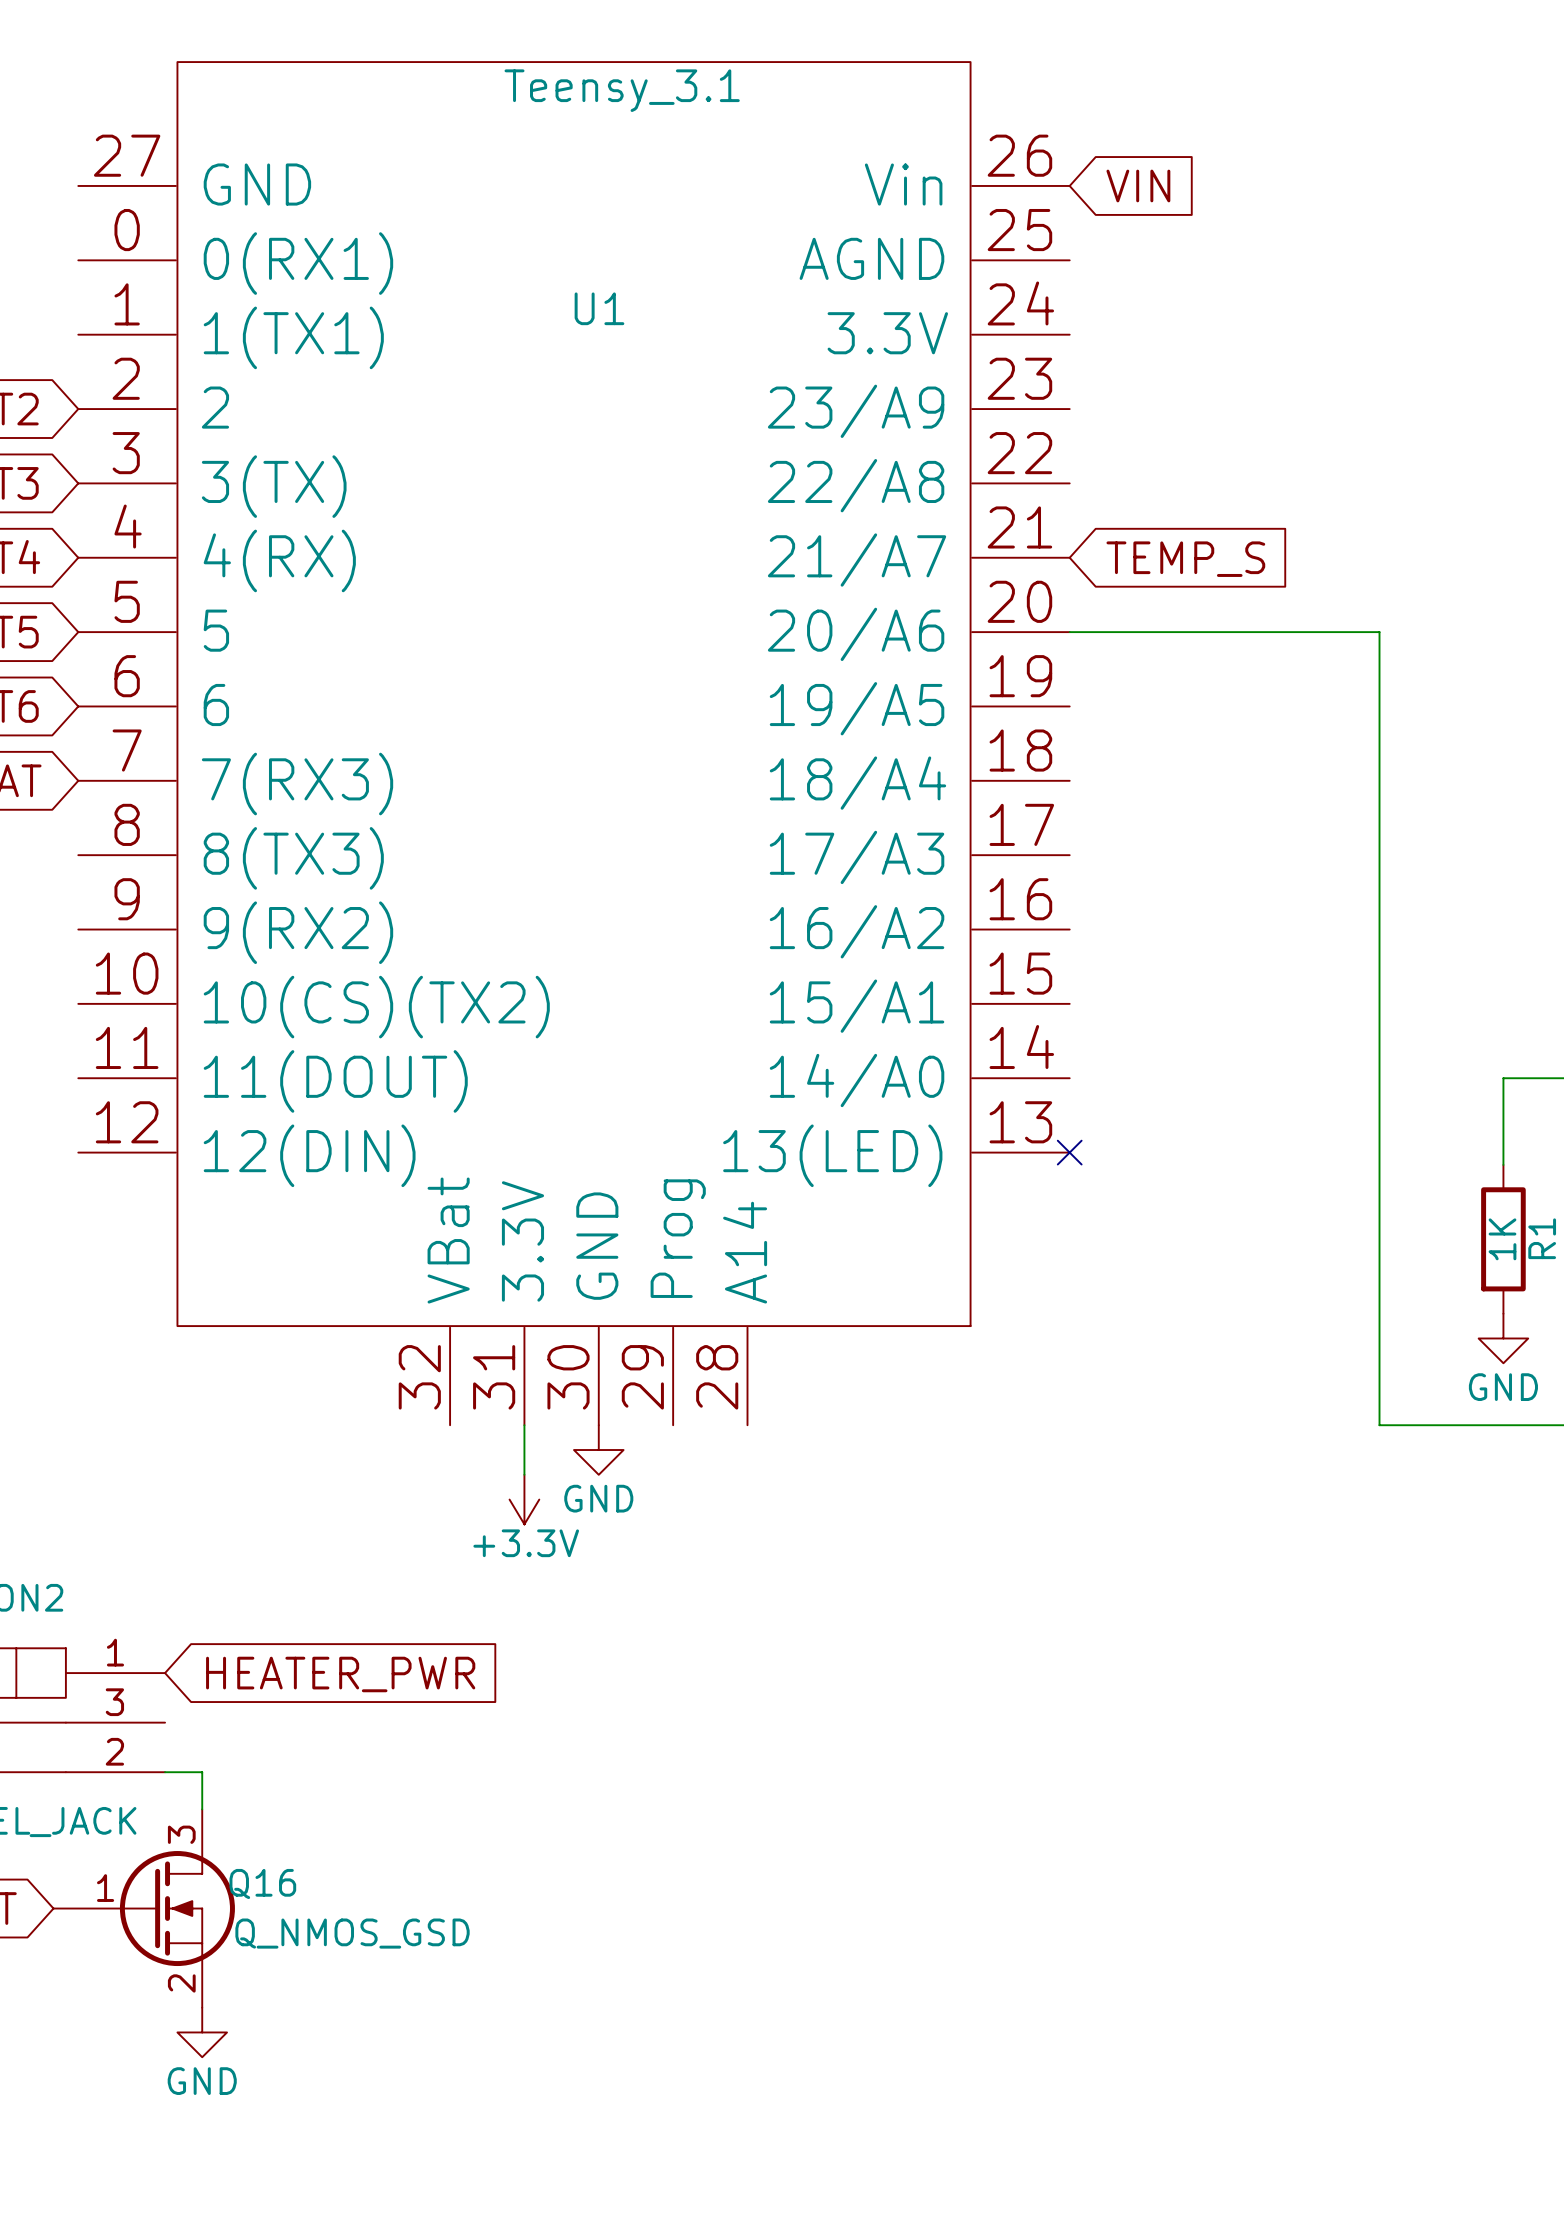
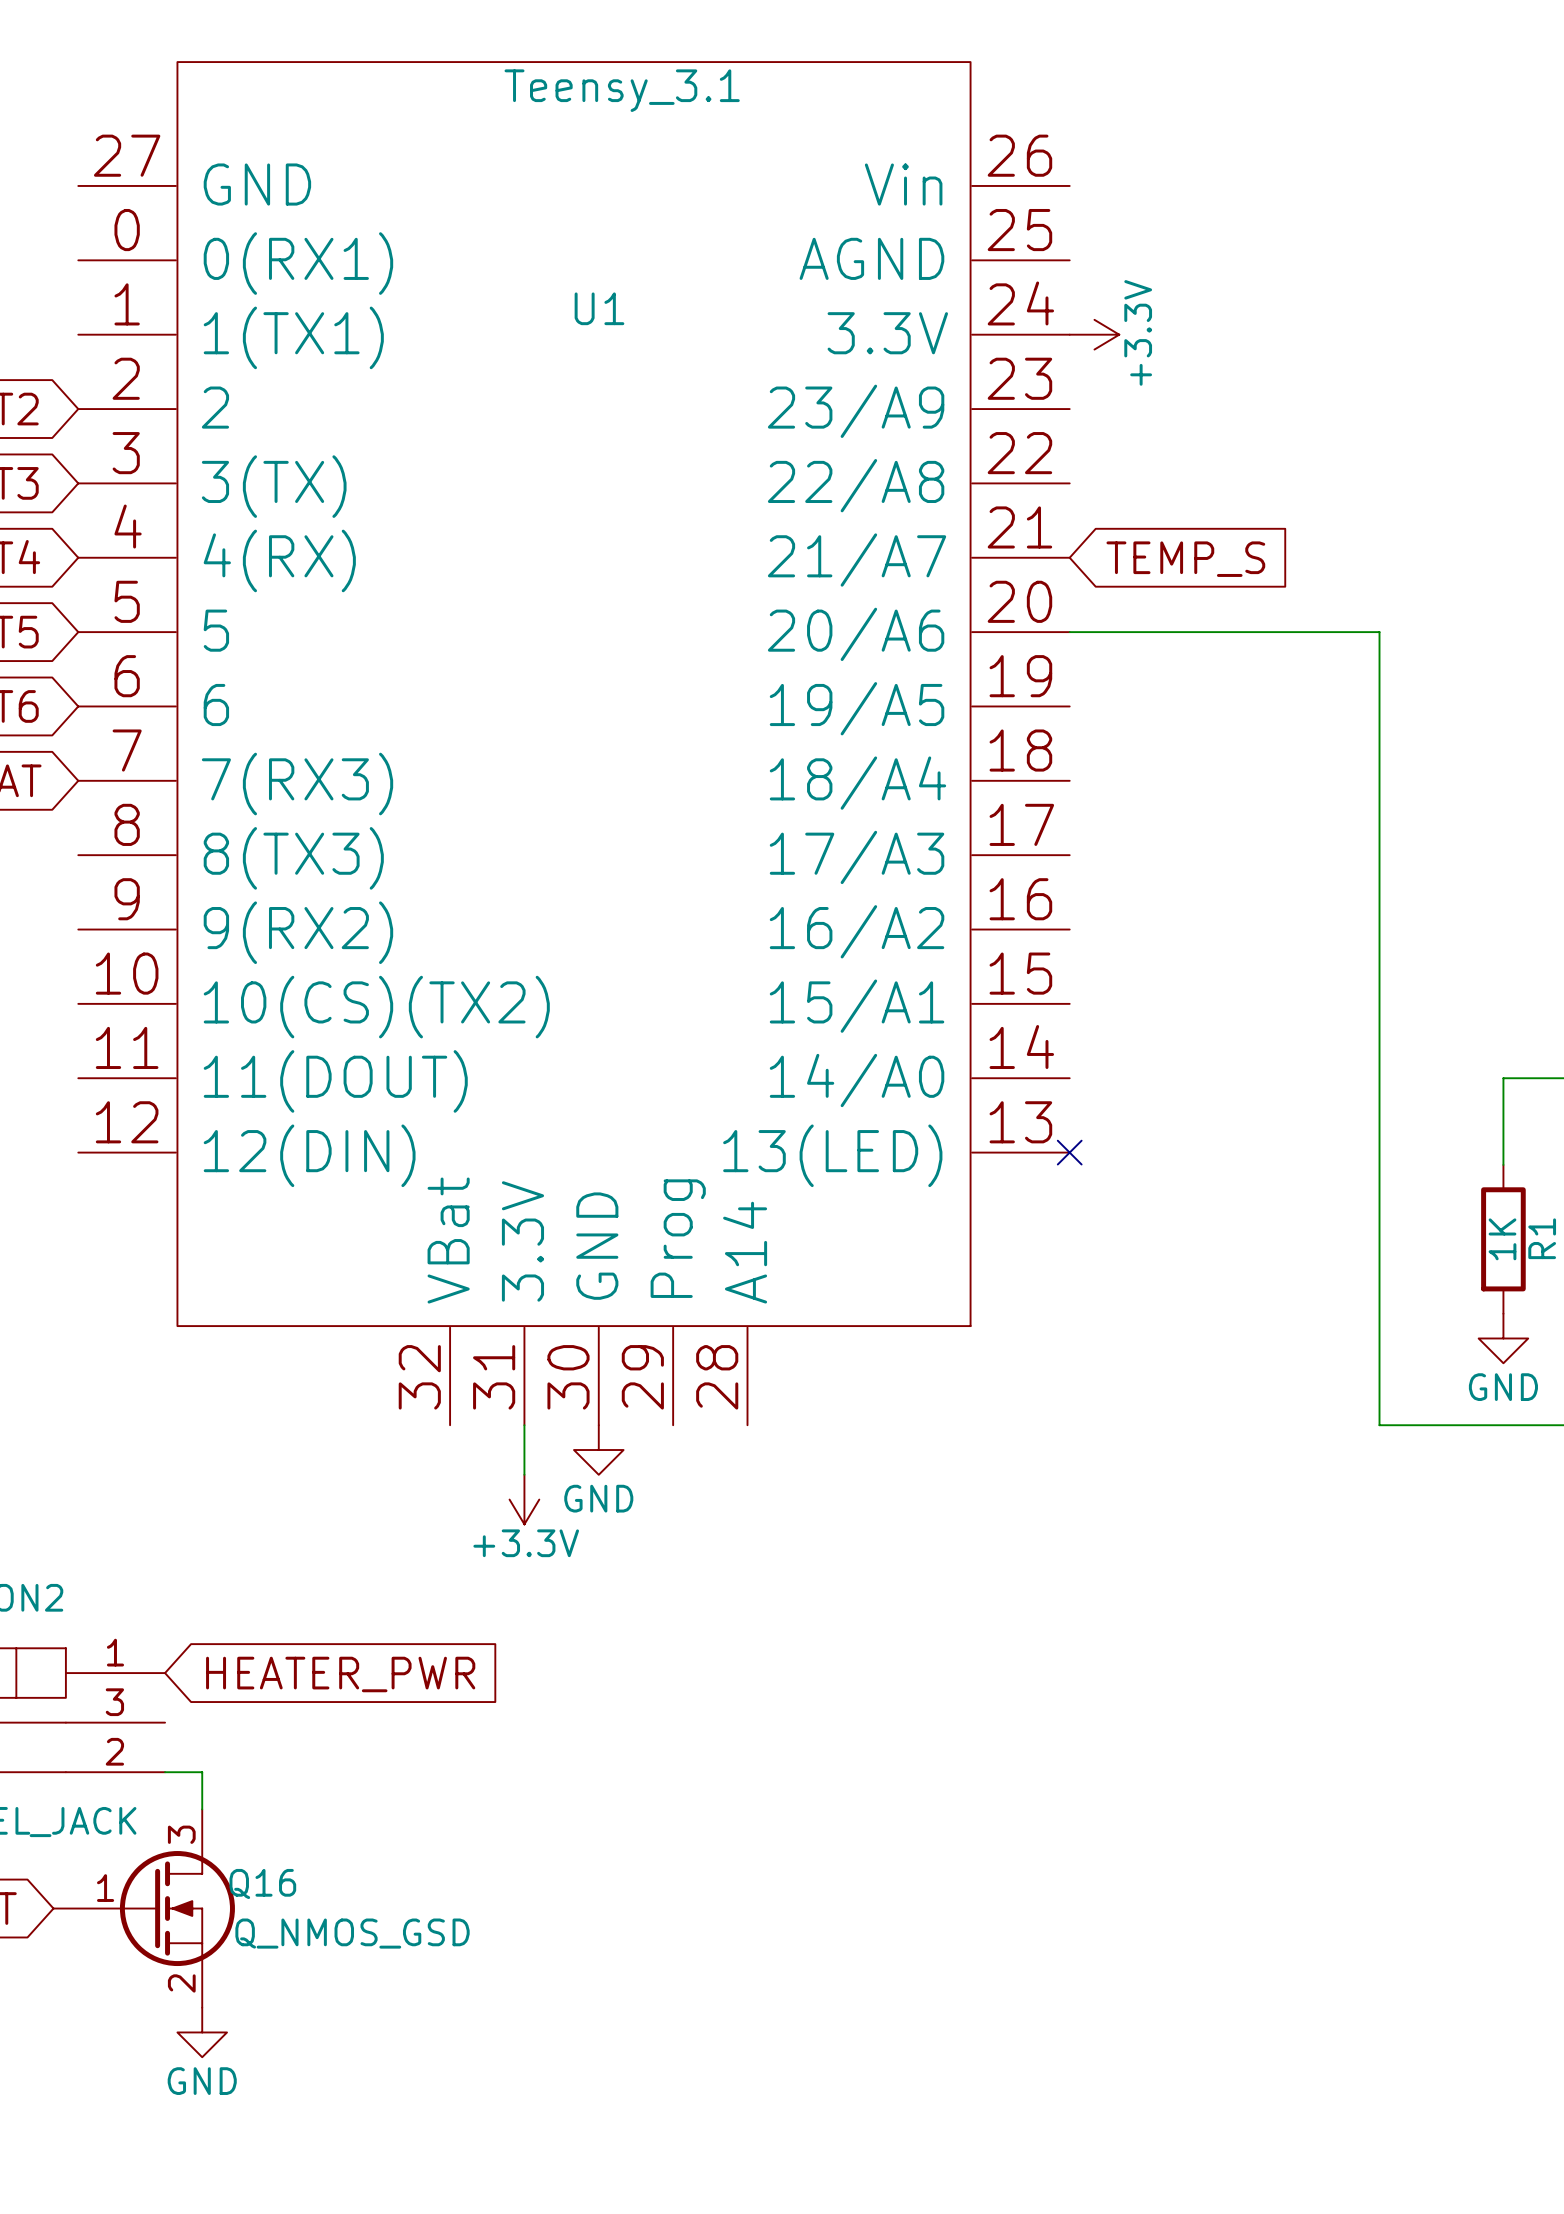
global label: VIN (1138, 185) -> none
power symbol: none -> +3.3V (1094, 334)

